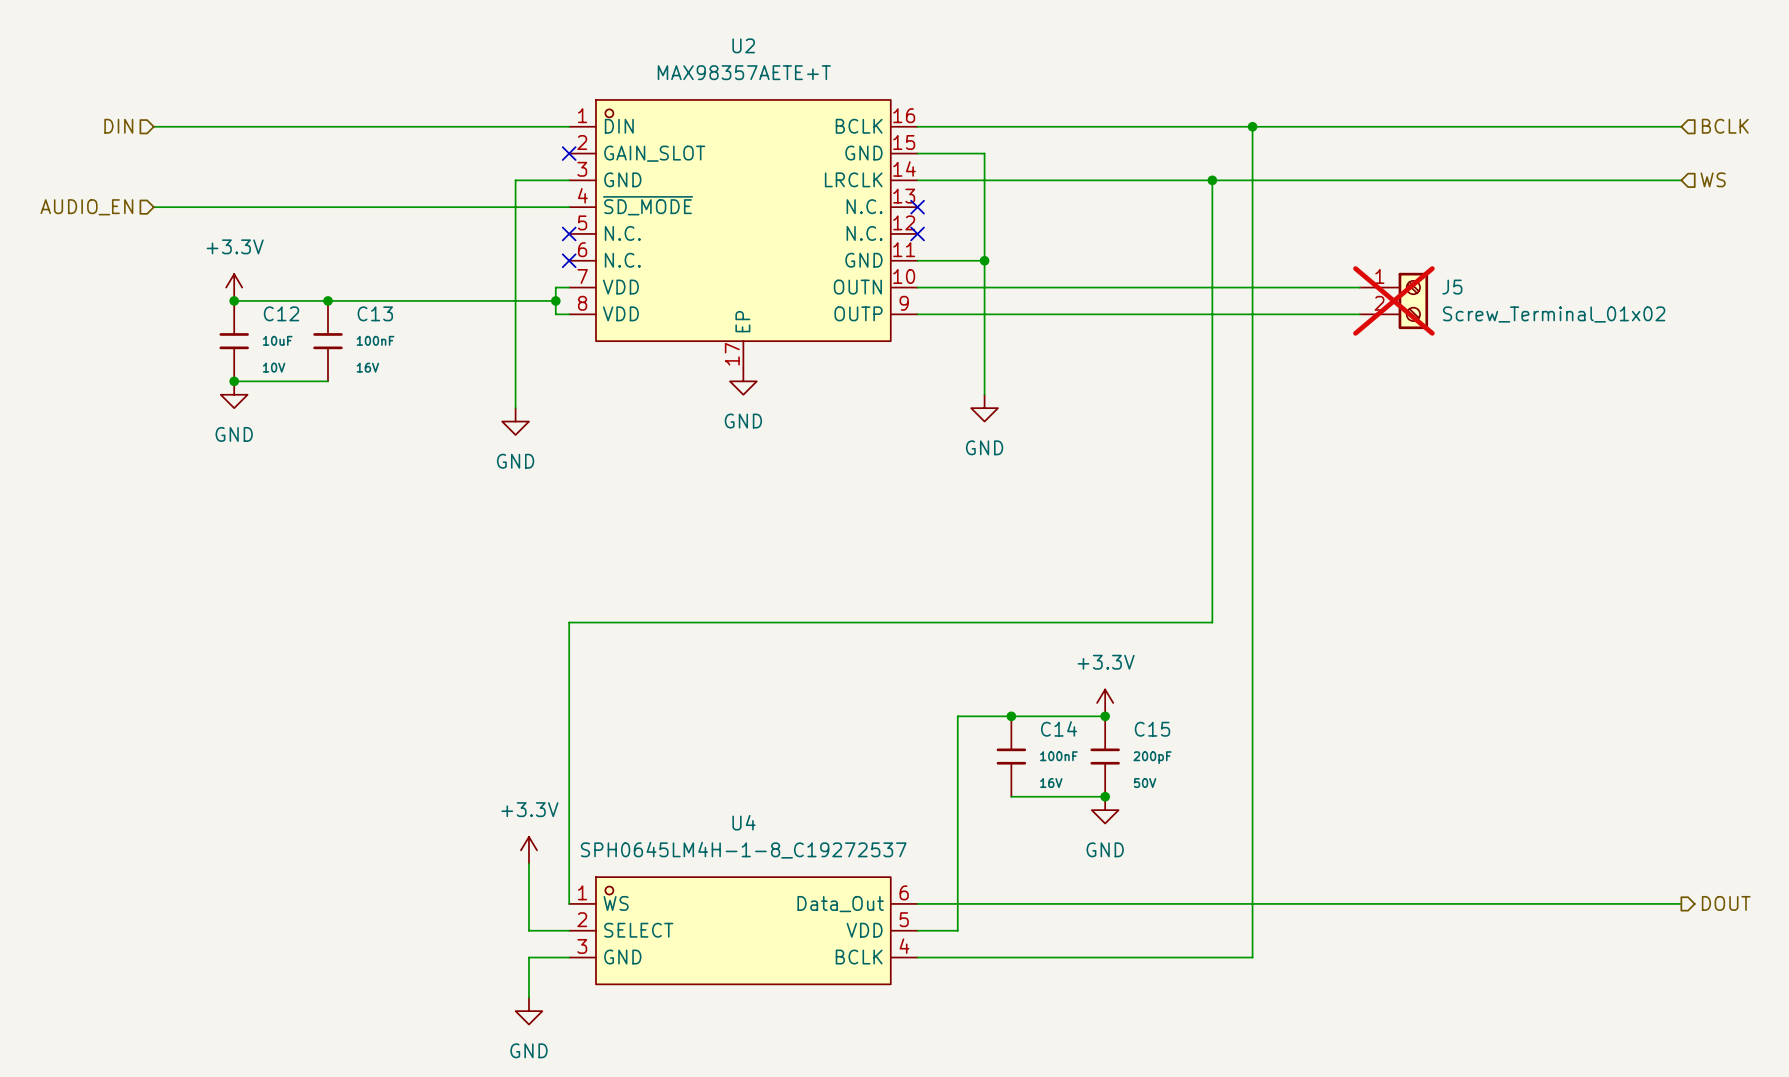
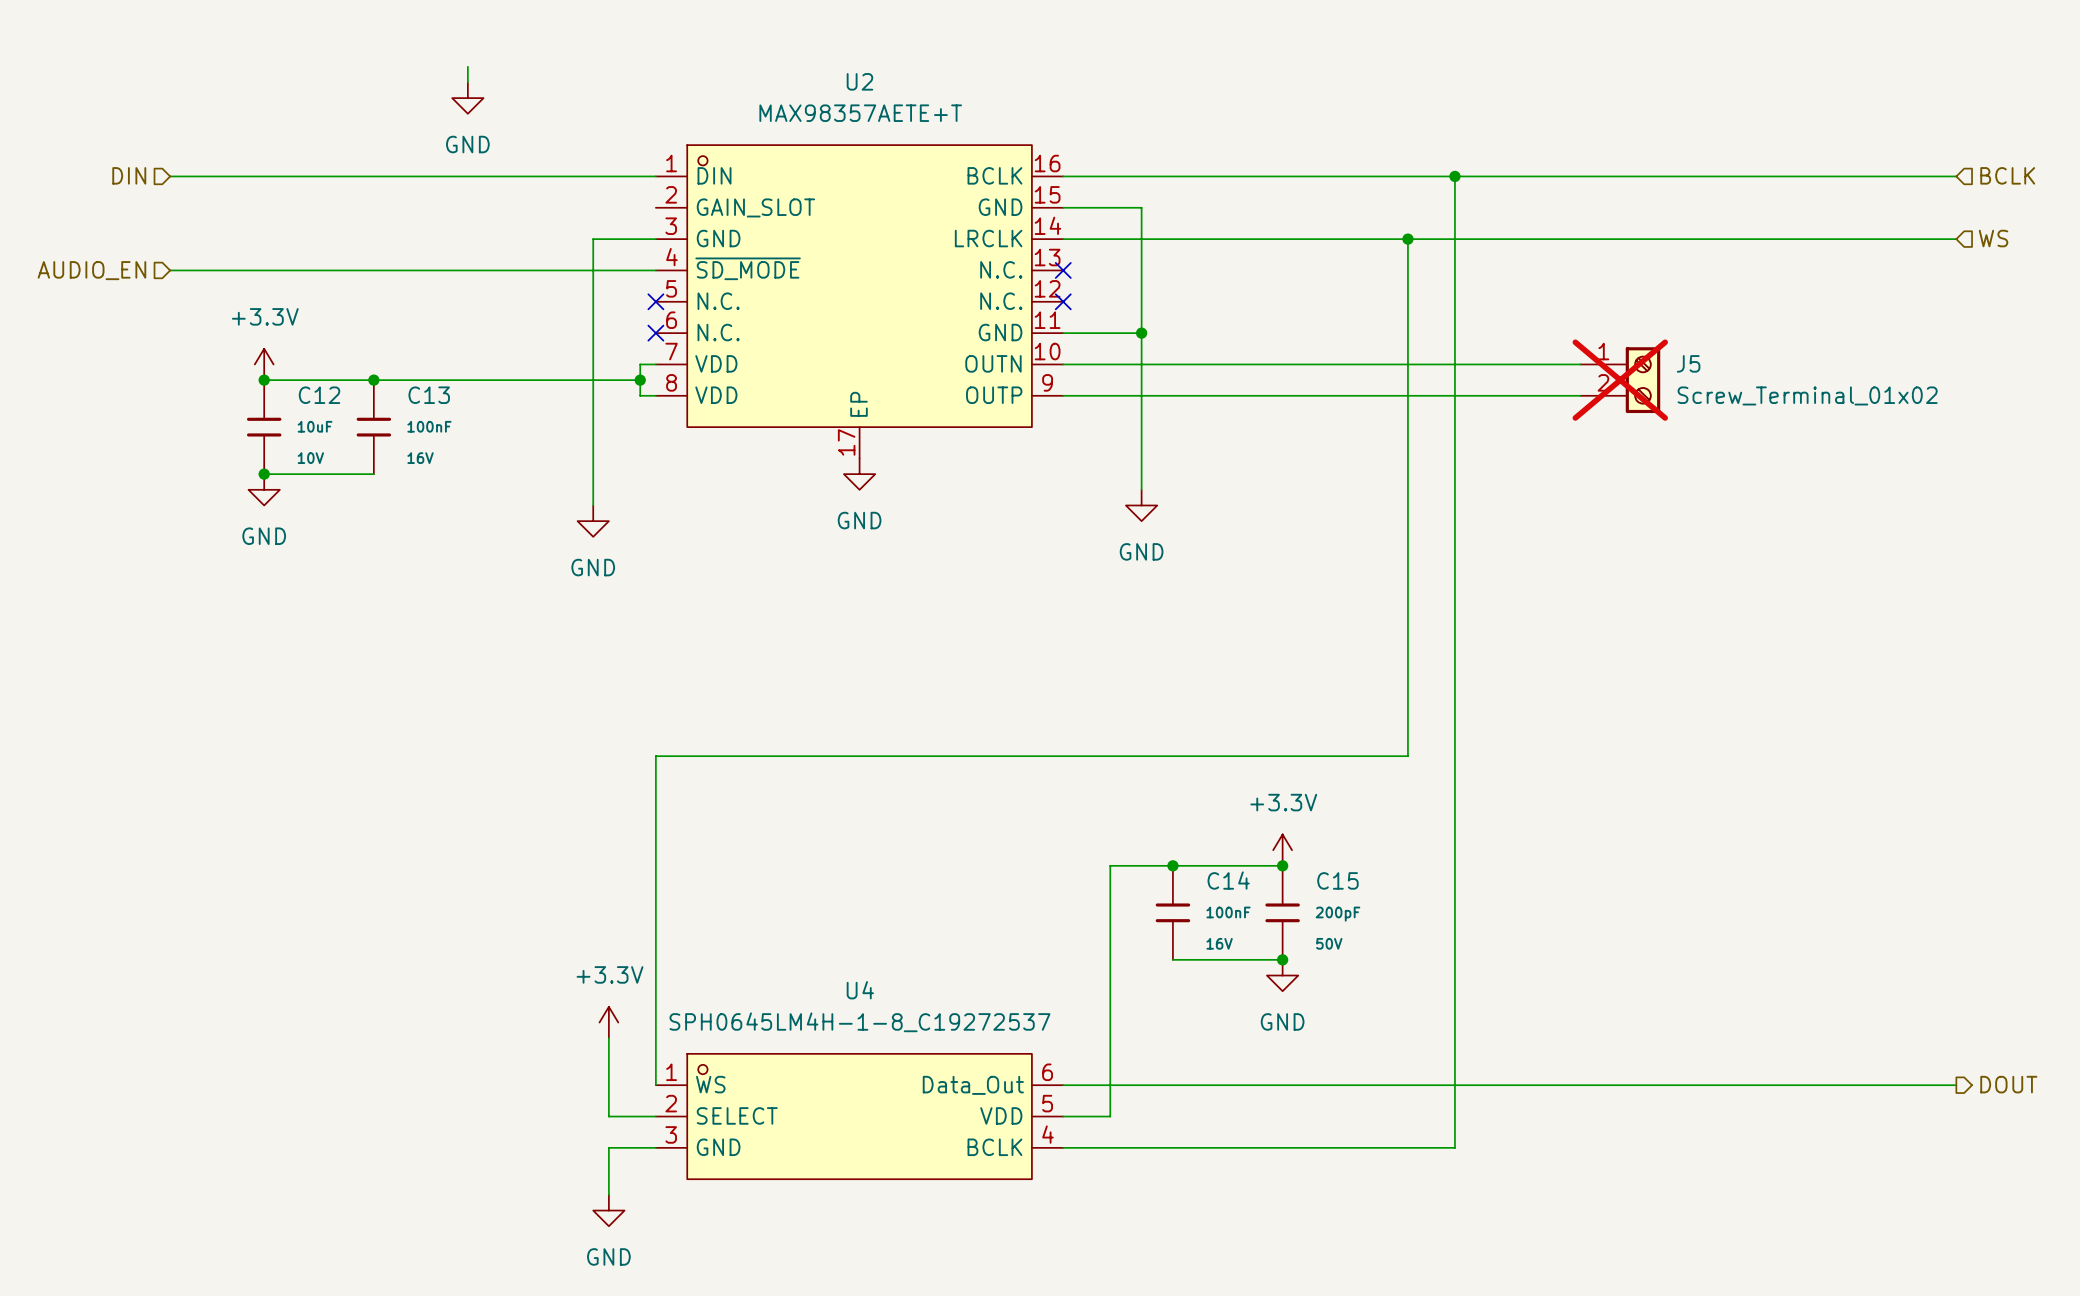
wire: none -> (467, 66) (467, 82)
power symbol: none -> GND (467, 98)
no-connect mark: (569, 153) -> none

